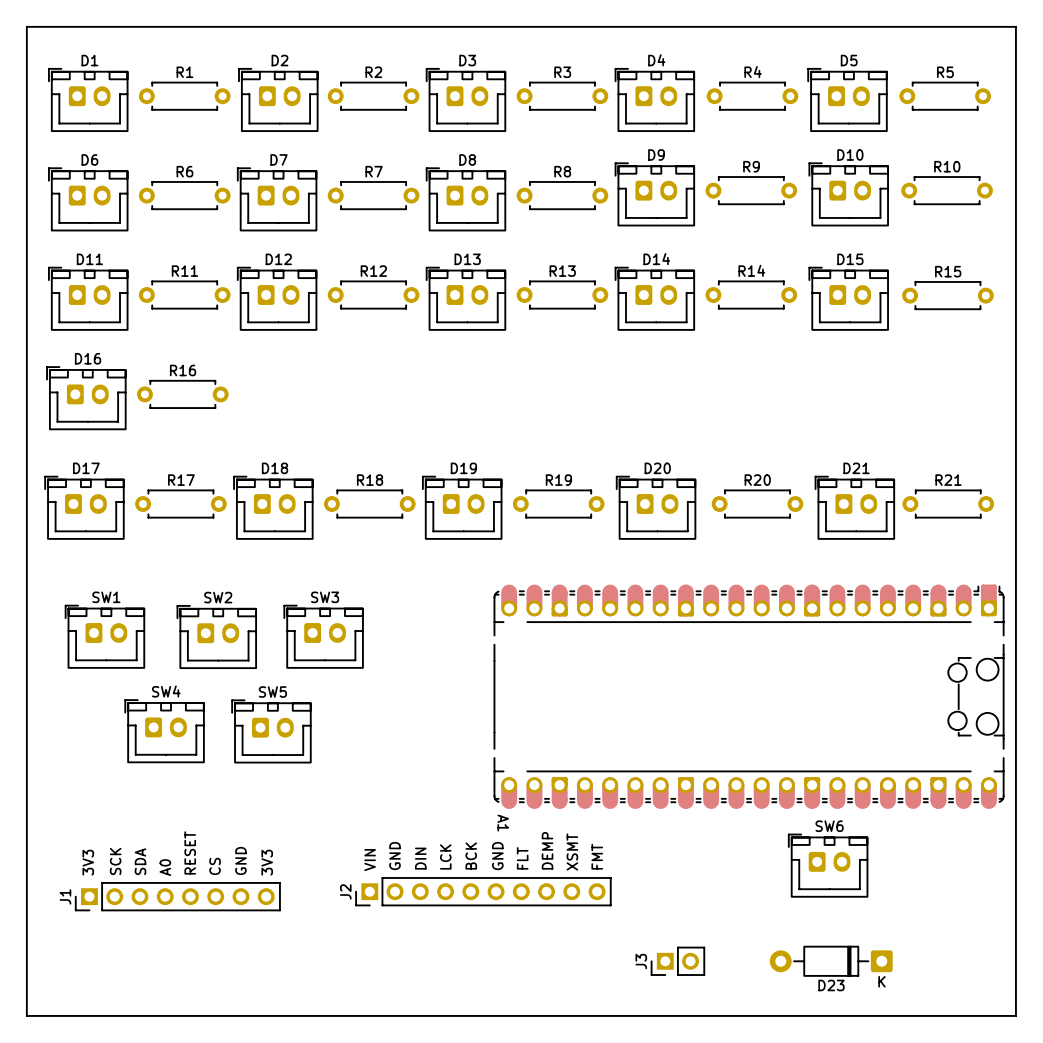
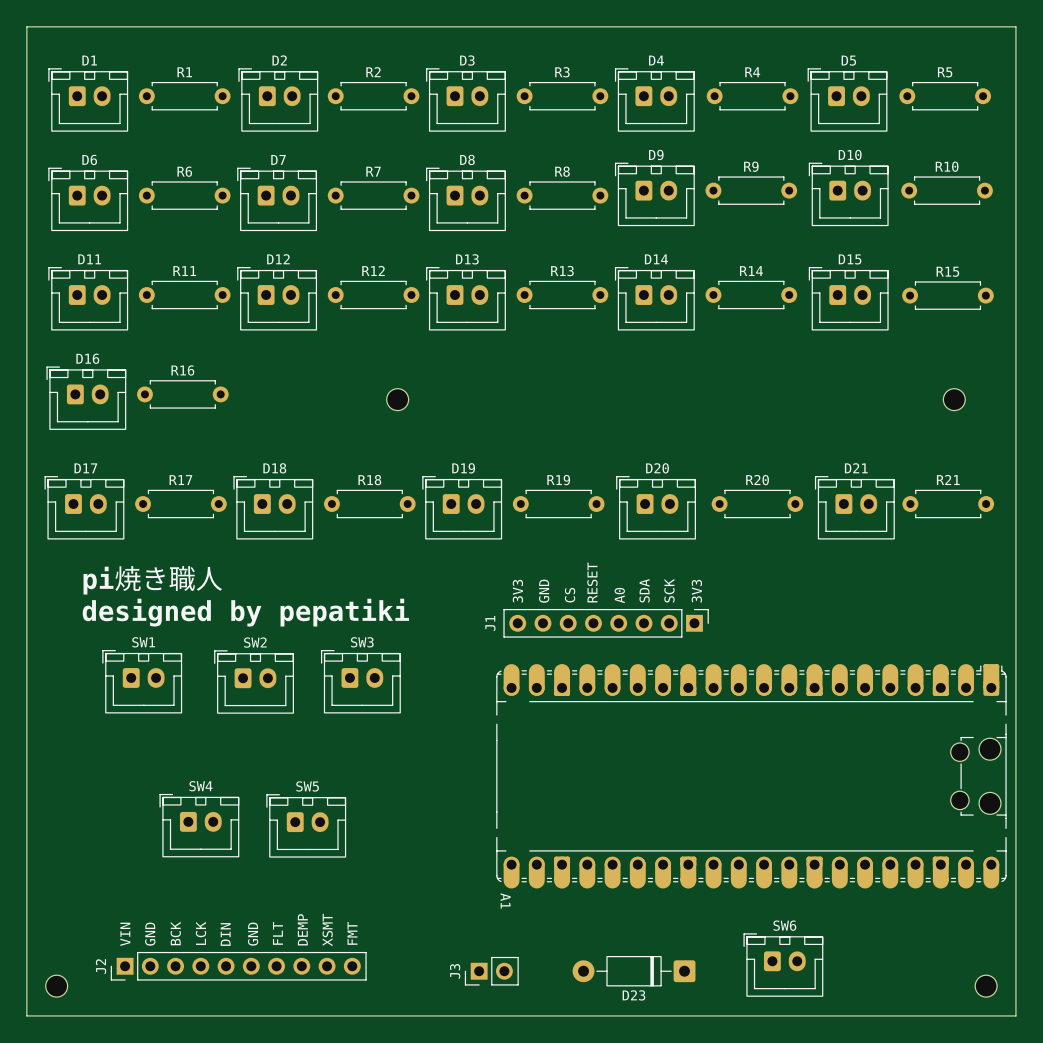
part: none -> (397, 399)
part: none -> (954, 399)
text: none -> pi焼き職人 (152, 580)
text: none -> designed by pepatiki (245, 612)
SW1 position: (104, 636) -> (142, 681)
SW3 position: (323, 636) -> (360, 681)
SW2 position: (216, 637) -> (254, 682)
A1 position: (749, 696) -> (751, 776)
SW4 position: (164, 731) -> (199, 825)
SW5 position: (271, 731) -> (306, 825)
J2 text position: BCK (471, 856) -> BCK (175, 933)
J2 text position: DIN (420, 858) -> DIN (225, 934)
SW6 position: (828, 865) -> (783, 965)
J1 footprint: [75, 882, 281, 911] -> [503, 608, 709, 638]
J2 position: (483, 891) -> (238, 966)
J3 position: (677, 961) -> (491, 971)
D23 position: (831, 961) -> (634, 971)
D23 text: K (881, 981) -> none
part: none -> (56, 986)
part: none -> (986, 986)

